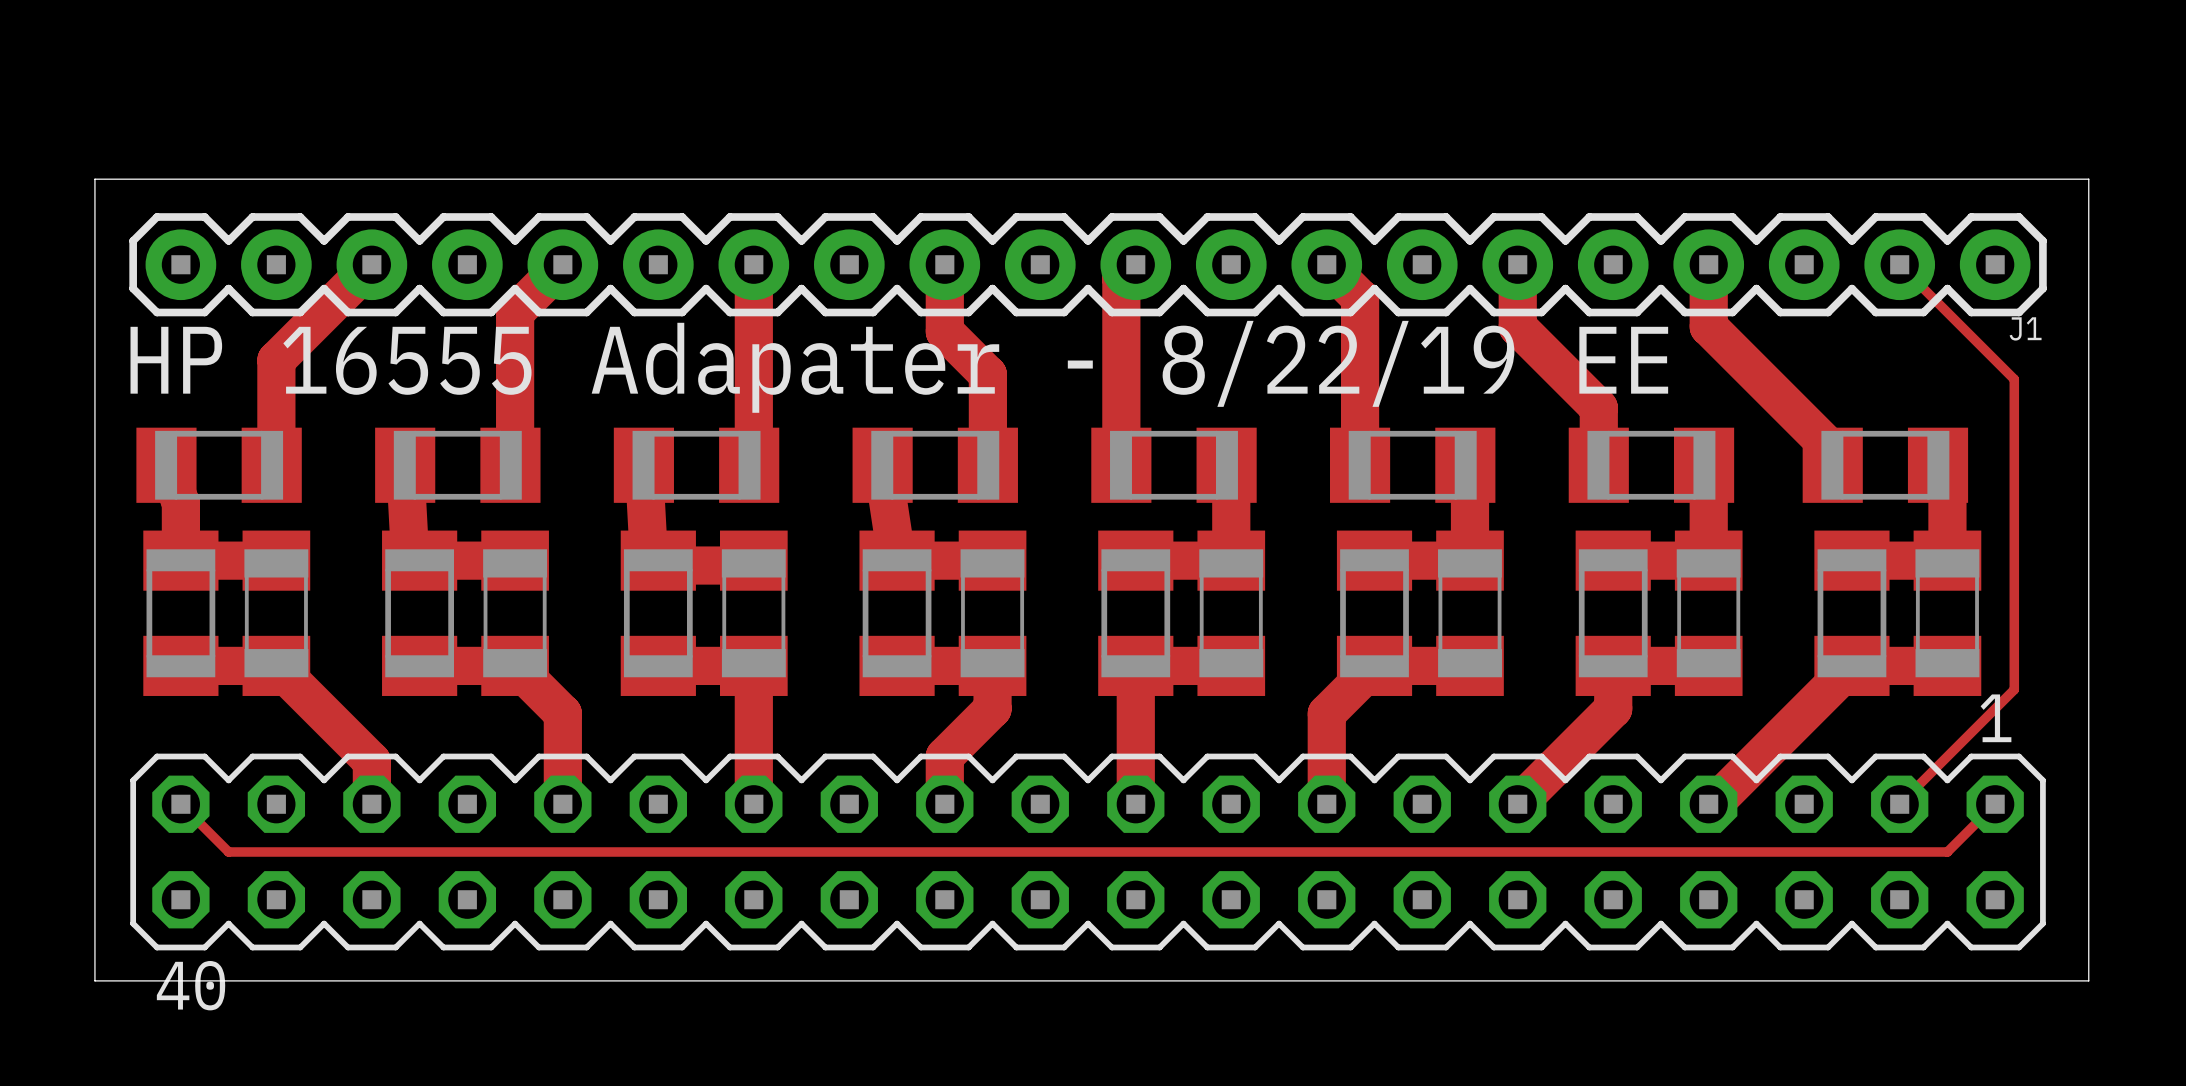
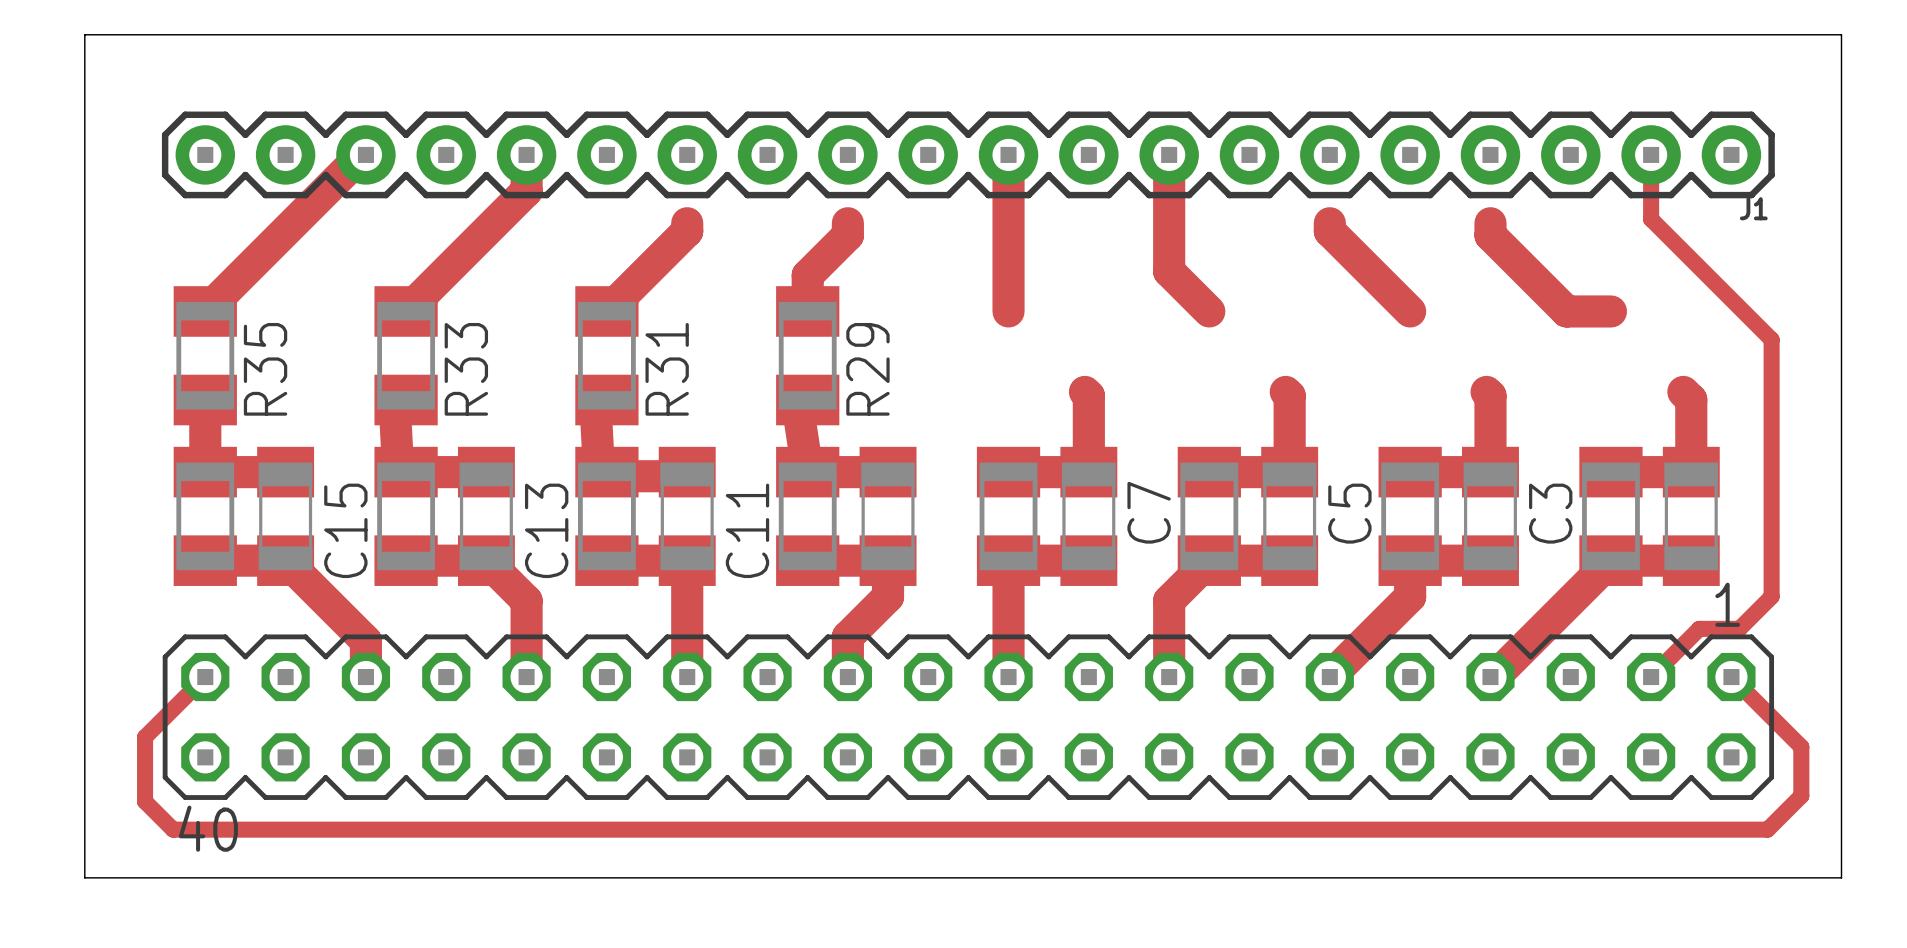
board edge: (94, 179) (2088, 179) (2088, 980) (94, 980) (94, 179) -> (84, 34) (84, 877) (1841, 877) (1841, 34) (84, 34)
track: none -> (365, 154) (361, 154) (205, 311)
track: none -> (526, 154) (526, 190) (406, 311)
track: none -> (1008, 154) (1008, 311)
track: none -> (1169, 154) (1169, 271) (1209, 311)
track: (371, 264) (276, 360) (276, 460) (271, 465) -> none
track: (562, 264) (515, 312) (515, 460) (510, 465) -> none
J1 position: (1088, 264) -> (968, 154)
track: (1135, 264) (1121, 279) (1121, 465) -> none
track: (1326, 264) (1360, 298) (1360, 465) -> none
track: (1899, 264) (2014, 379) (2014, 689) (1956, 746) -> (1651, 154) (1651, 219) (1771, 339) (1771, 596) (1739, 628) (1699, 628)
track: (753, 274) (753, 460) (749, 465) -> (687, 231) (606, 311)
track: (1517, 274) (1517, 326) (1598, 407) (1598, 465) -> (1329, 231) (1410, 311)
track: (944, 279) (944, 331) (987, 374) (987, 465) -> (847, 235) (807, 275) (807, 311)
track: (1708, 279) (1708, 326) (1832, 450) (1832, 465) -> (1490, 235) (1566, 311) (1610, 311)
text: HP 16555 Adapater - 8/22/19 EE (899, 366) -> none
R35: none -> (205, 355)
R33: none -> (406, 355)
R31: none -> (606, 355)
R29: none -> (807, 355)
part: (219, 465) -> none
part: (457, 465) -> none
part: (696, 465) -> none
part: (935, 465) -> none
part: (1173, 465) -> none
part: (1412, 465) -> none
part: (1651, 465) -> none
part: (1885, 465) -> none
C7 name: none -> C7 (1149, 512)
C5 name: none -> C5 (1349, 513)
C3 name: none -> C3 (1550, 513)
C15 name: none -> C15 (345, 530)
C11 name: none -> C11 (747, 530)
C13 name: none -> C13 (546, 530)
track width: thin (1956, 746) (1899, 804) -> thick (1699, 628) (1651, 677)
track: (180, 804) (228, 852) (1947, 852) (1995, 804) -> (205, 677) (145, 737) (145, 801) (173, 829) (1767, 829) (1801, 795) (1801, 746) (1731, 677)

